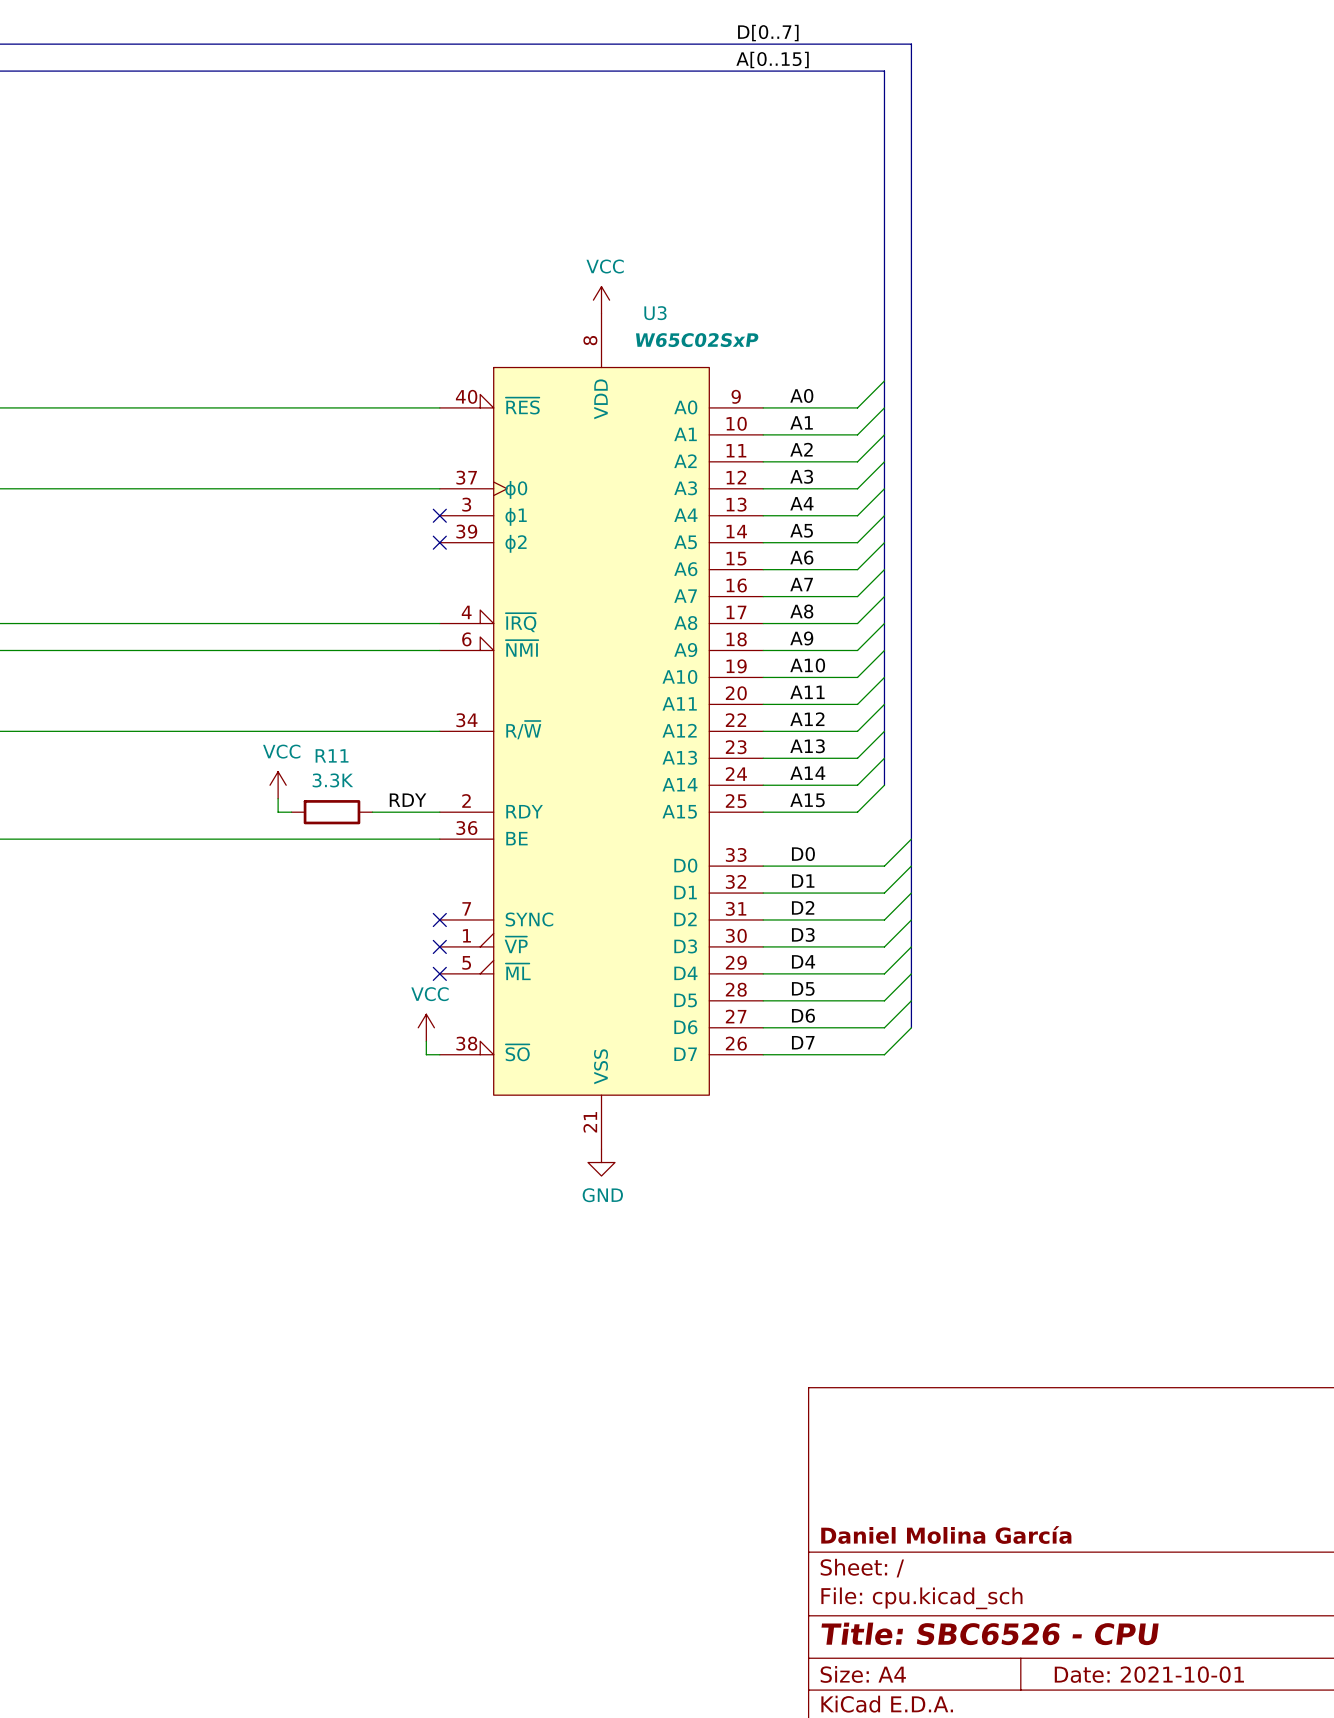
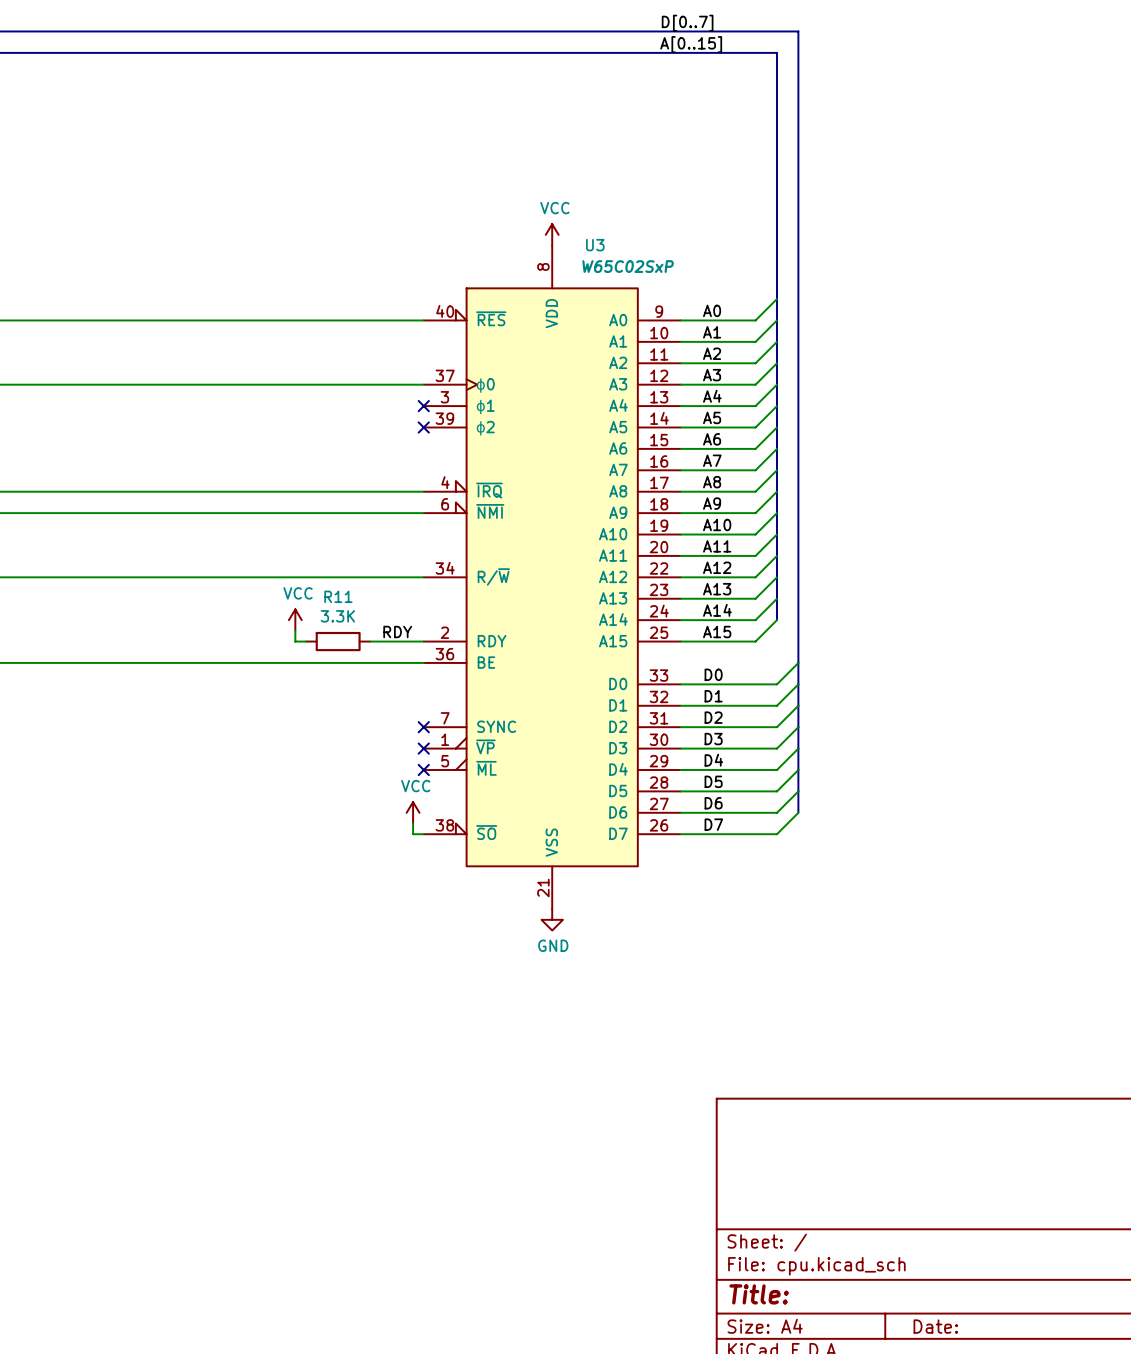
title block: Daniel Molina García (946, 1535) -> none
title block: Title: SBC6526 - CPU (990, 1633) -> Title: (759, 1294)
title block: Date: 2021-10-01 (1149, 1674) -> Date: (935, 1326)

